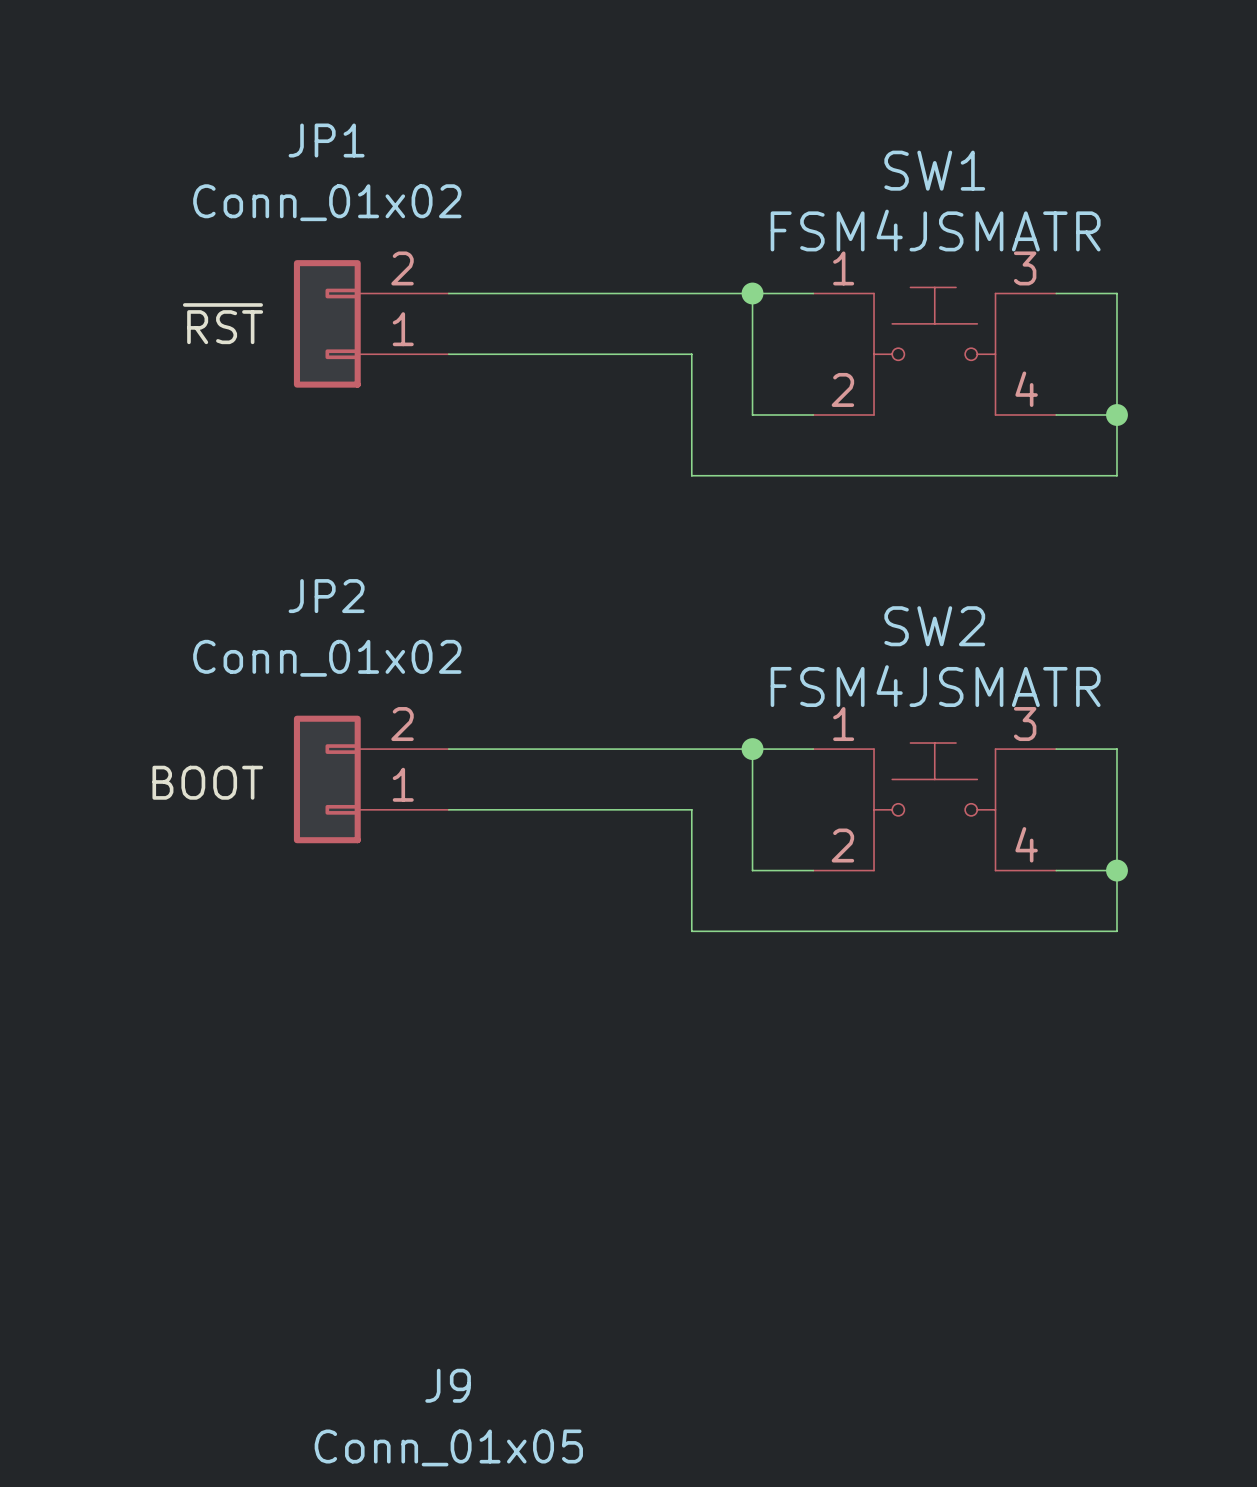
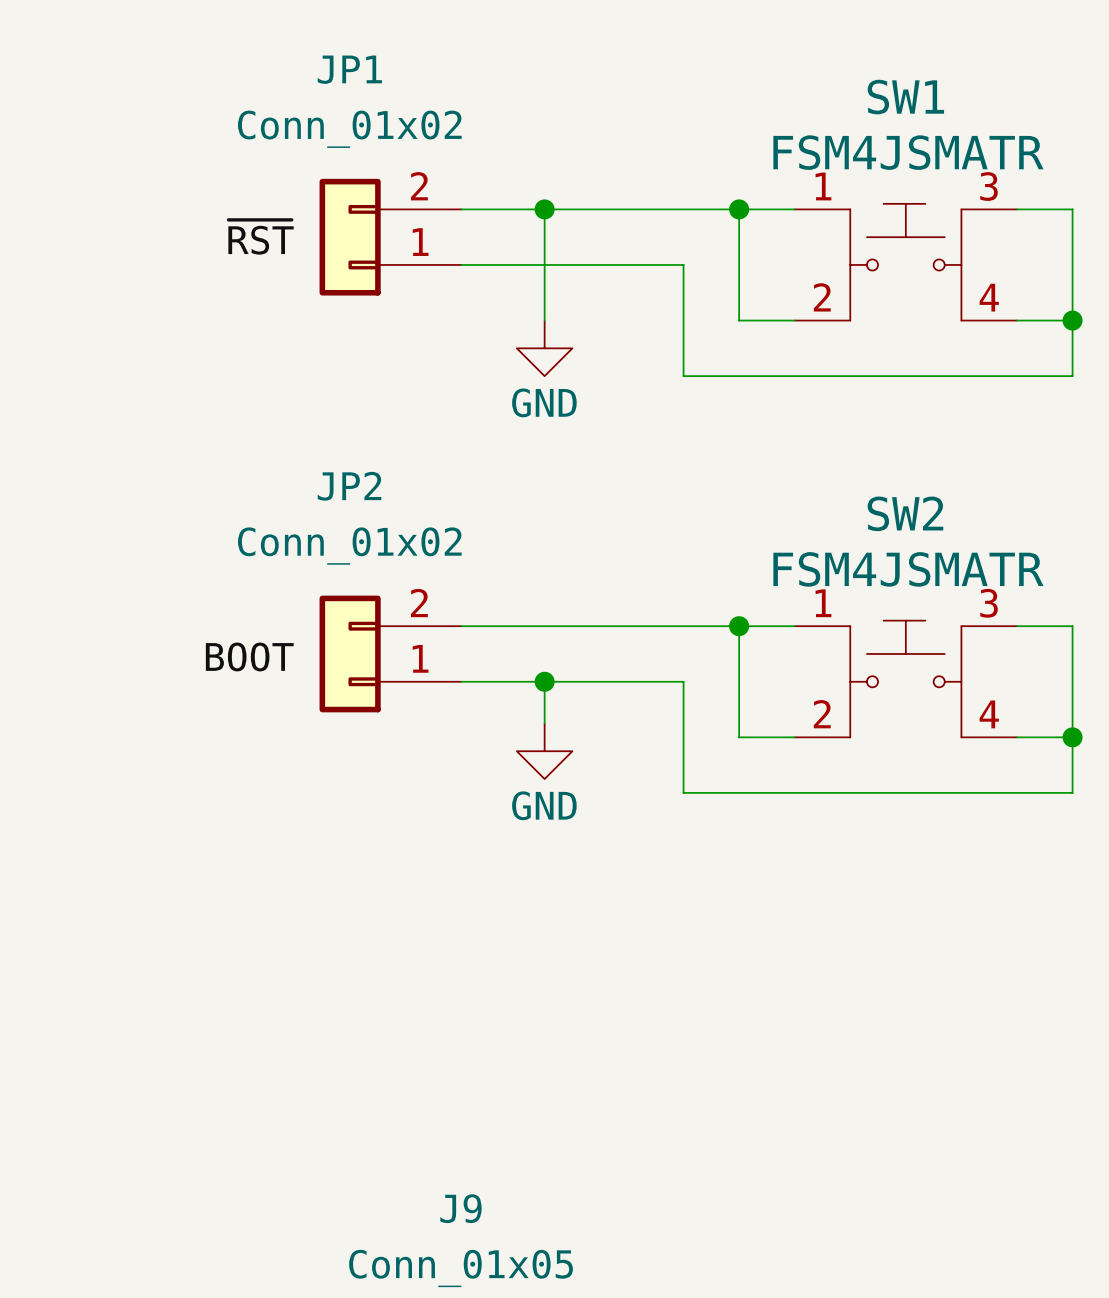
wire: none -> (544, 209) (544, 320)
junction: none -> (544, 209)
power symbol: none -> GND (544, 348)
wire: none -> (544, 681) (544, 723)
junction: none -> (544, 681)
power symbol: none -> GND (544, 751)

